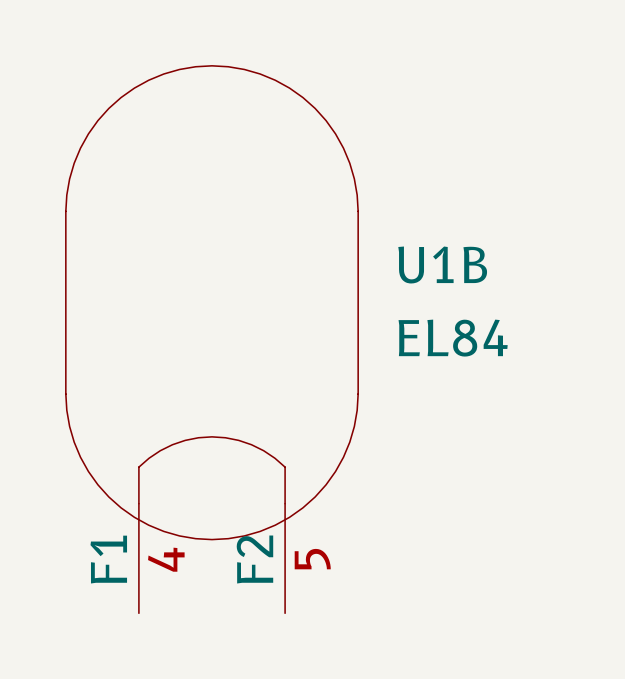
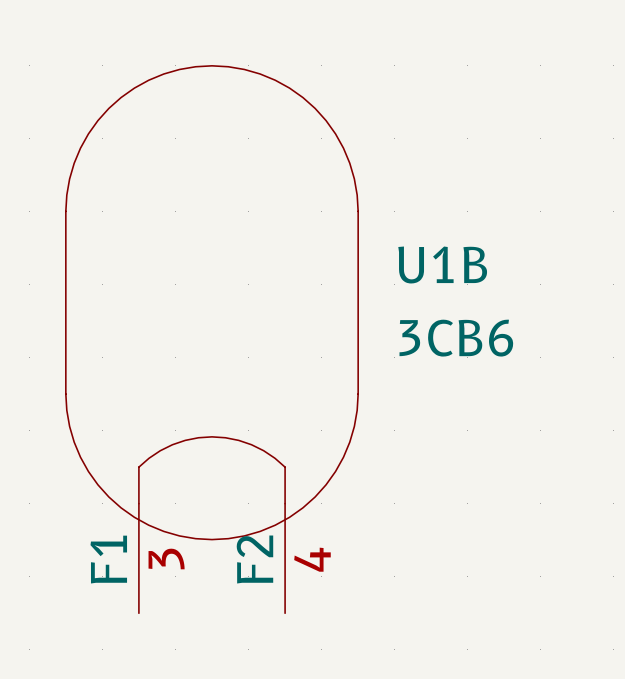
U1B value: EL84 (453, 338) -> 3CB6 (456, 338)
U1B pin number: 4 (166, 559) -> 3 (166, 558)
U1B pin number: 5 (312, 559) -> 4 (312, 559)

